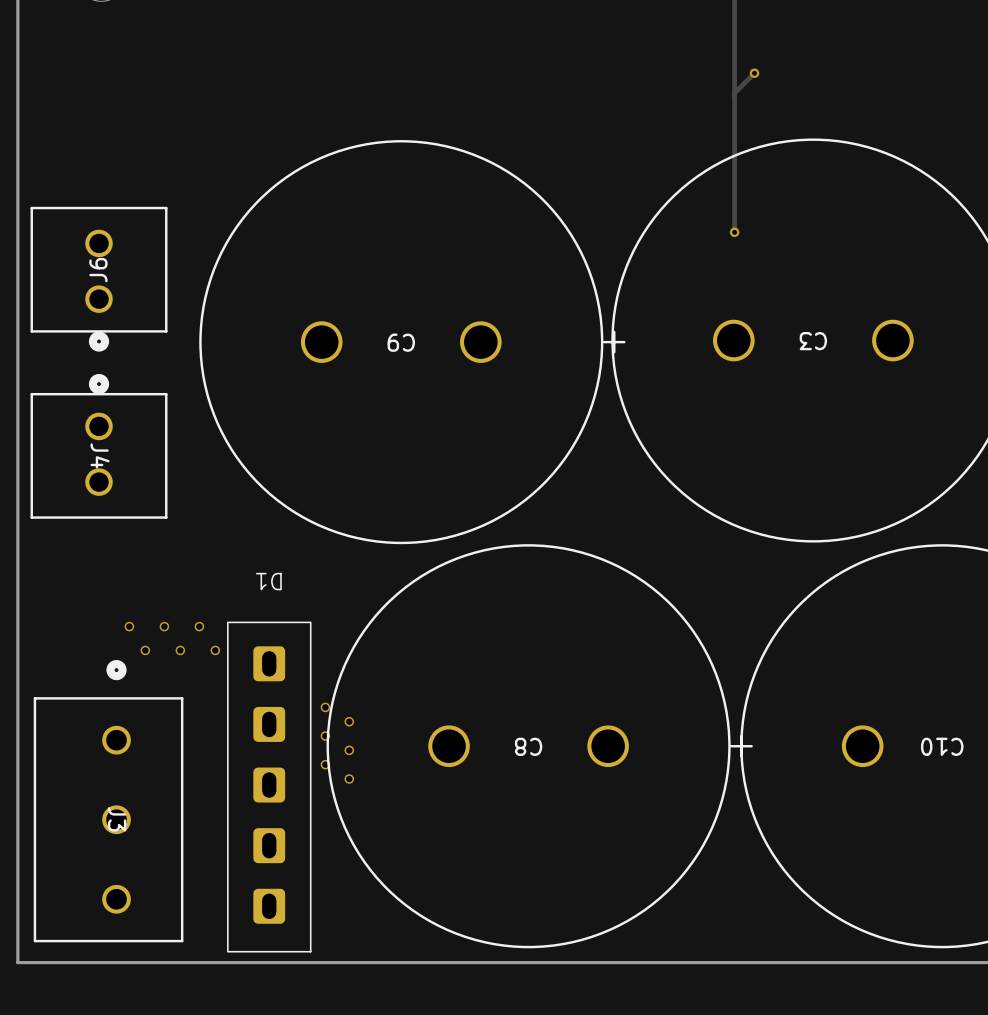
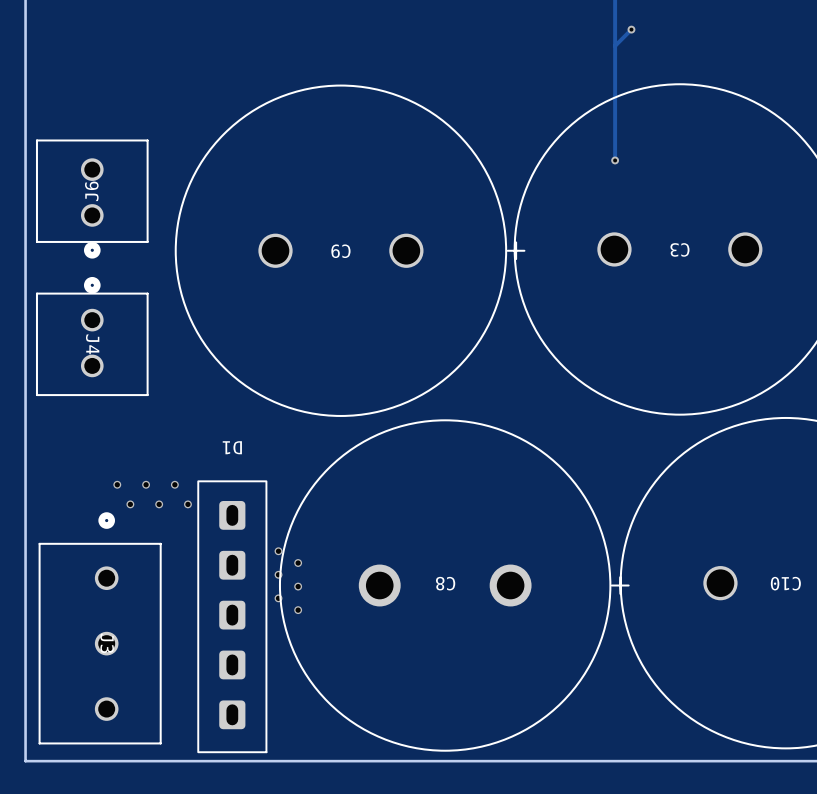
C8 footprint: [326, 544, 753, 949] -> [278, 419, 630, 752]

